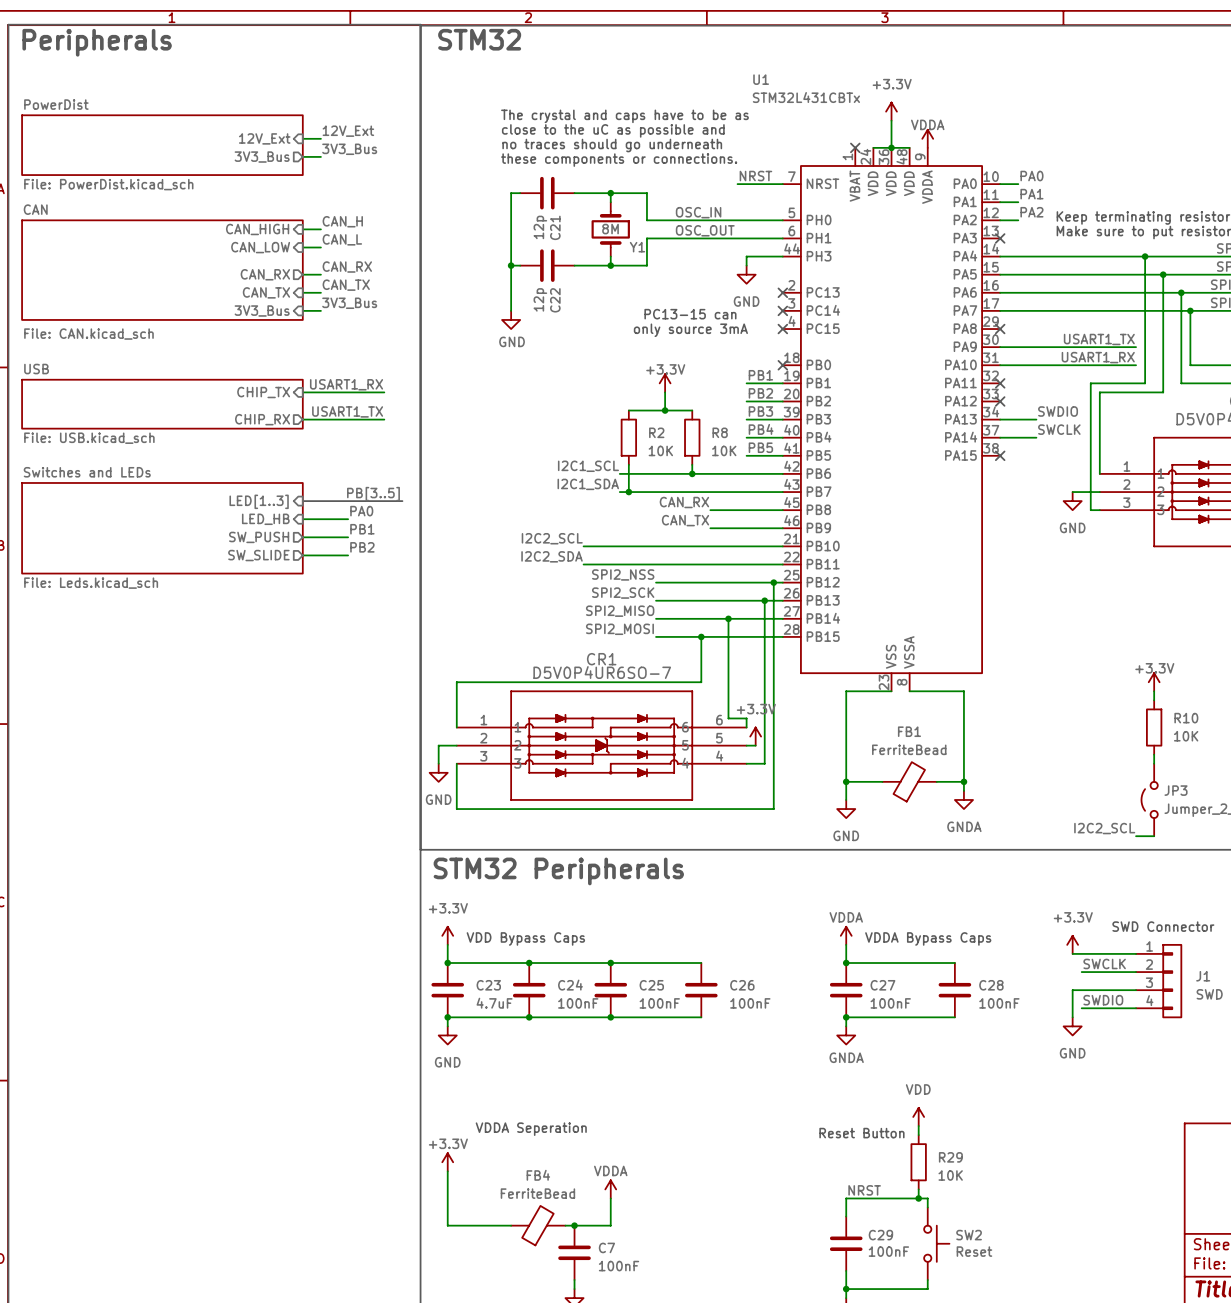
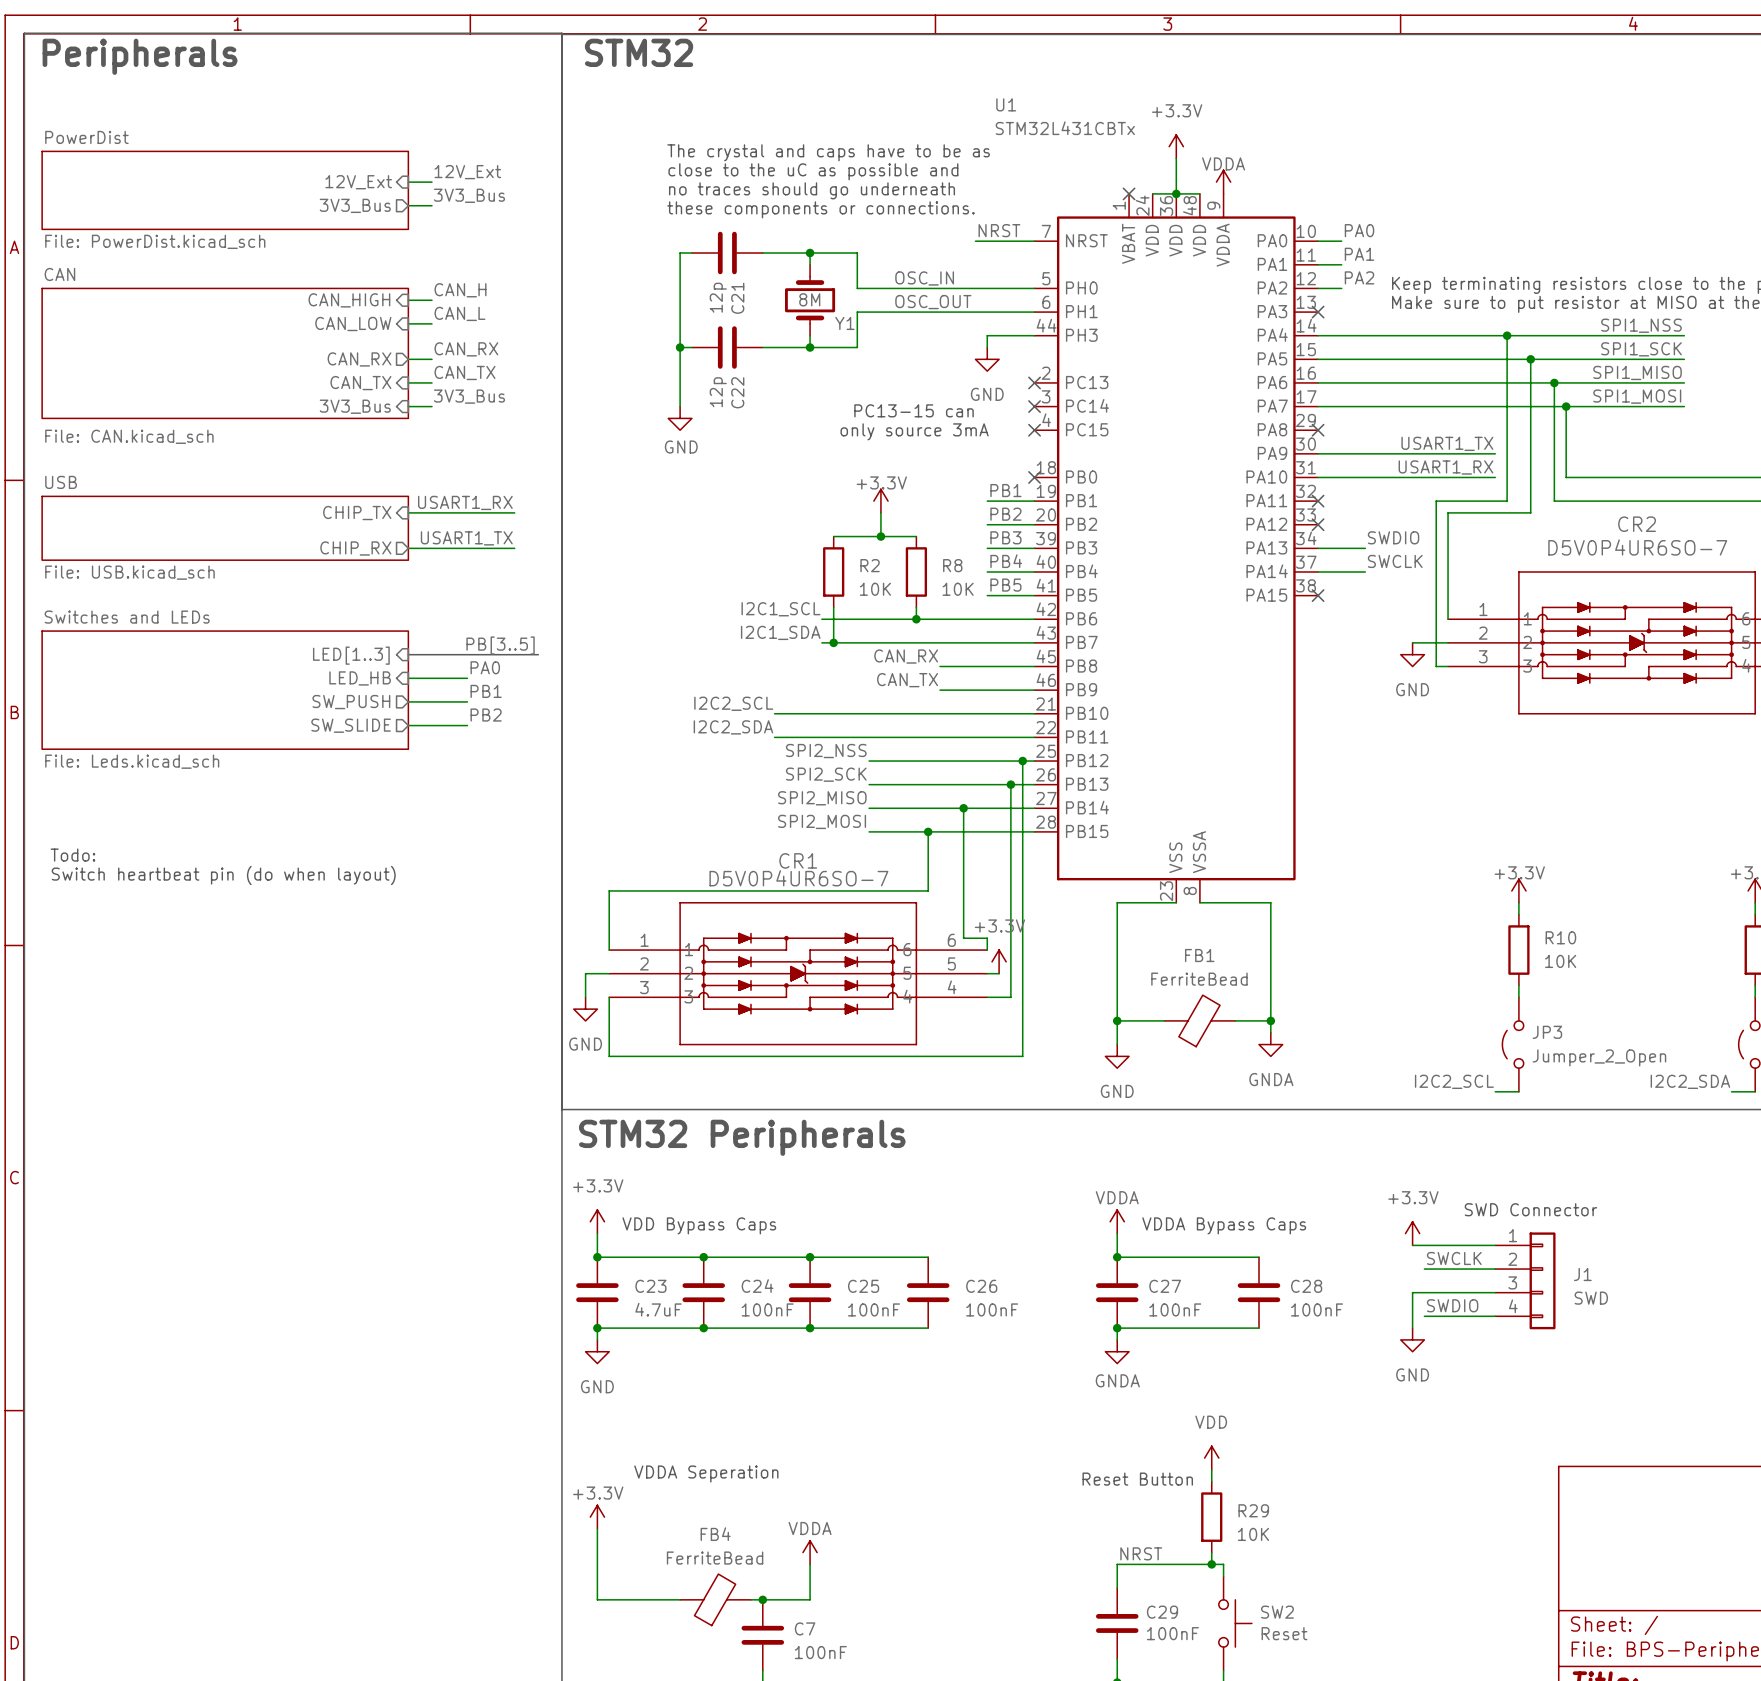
text: none -> Todo: (72, 855)
text: none -> Switch heartbeat pin (do when layout) (223, 875)

